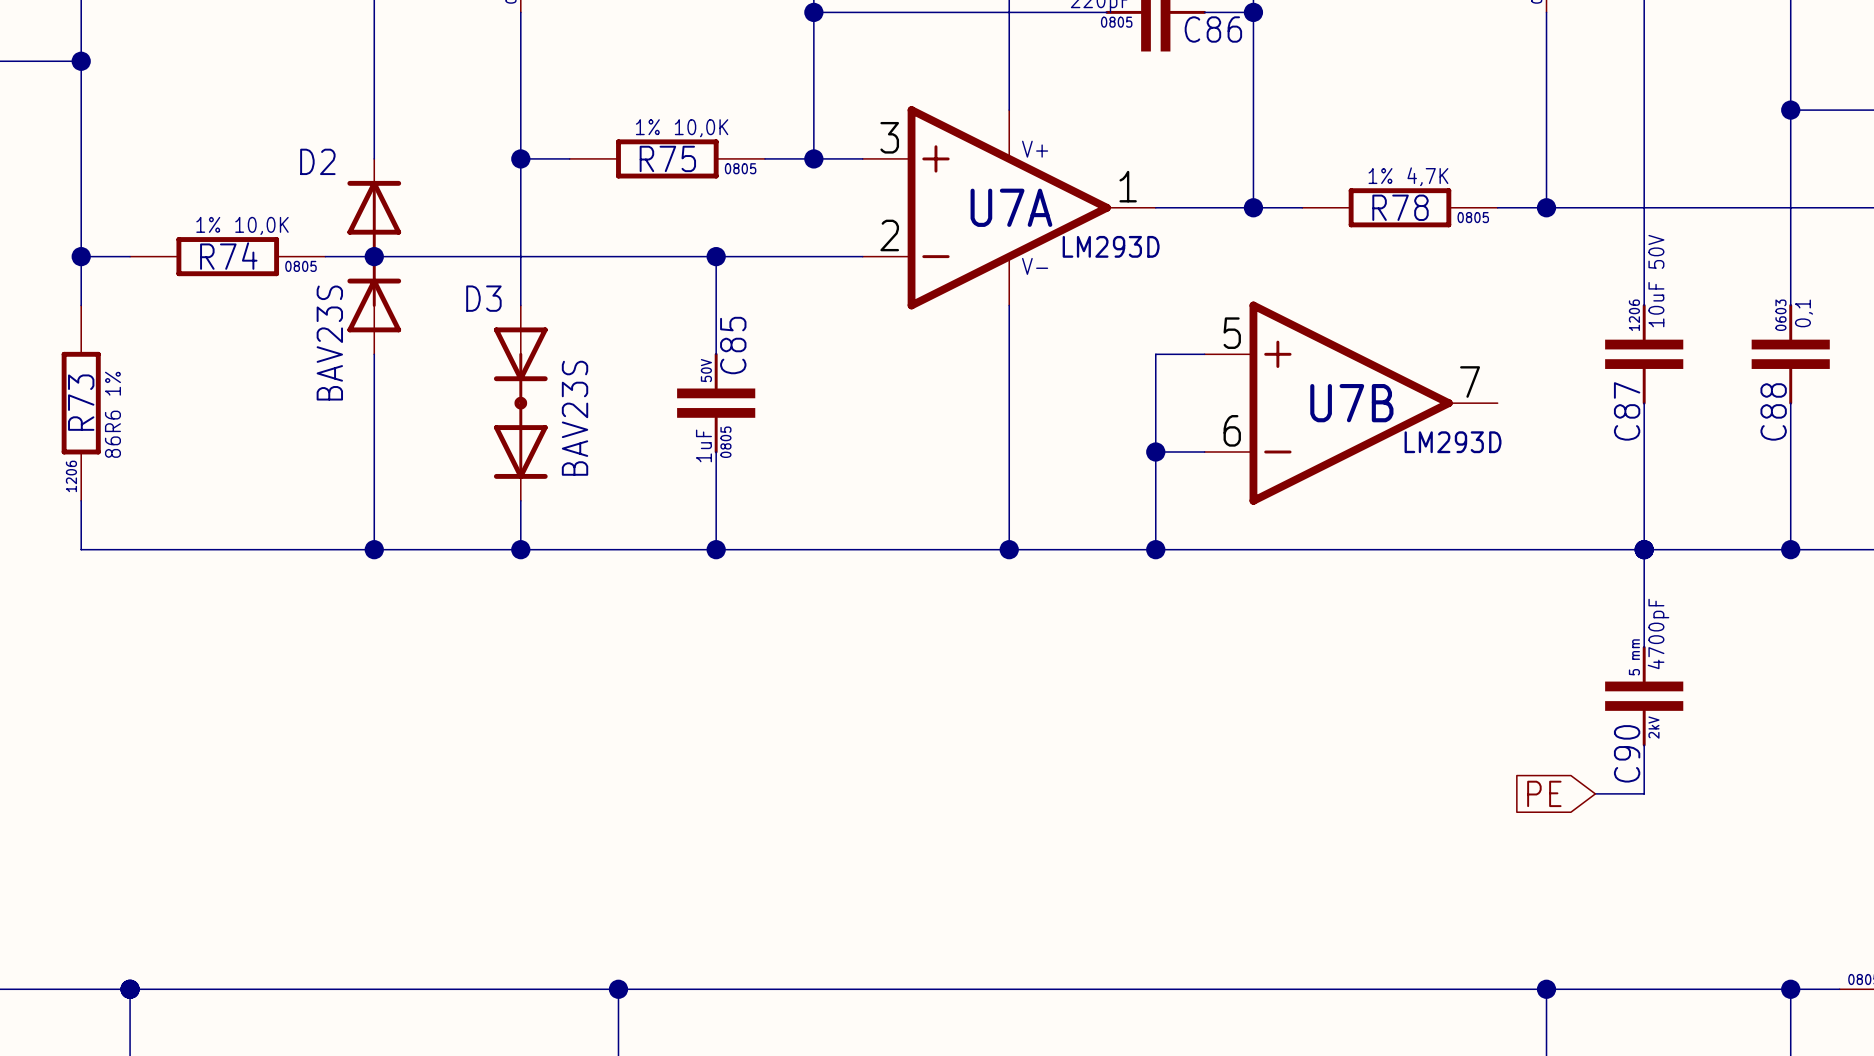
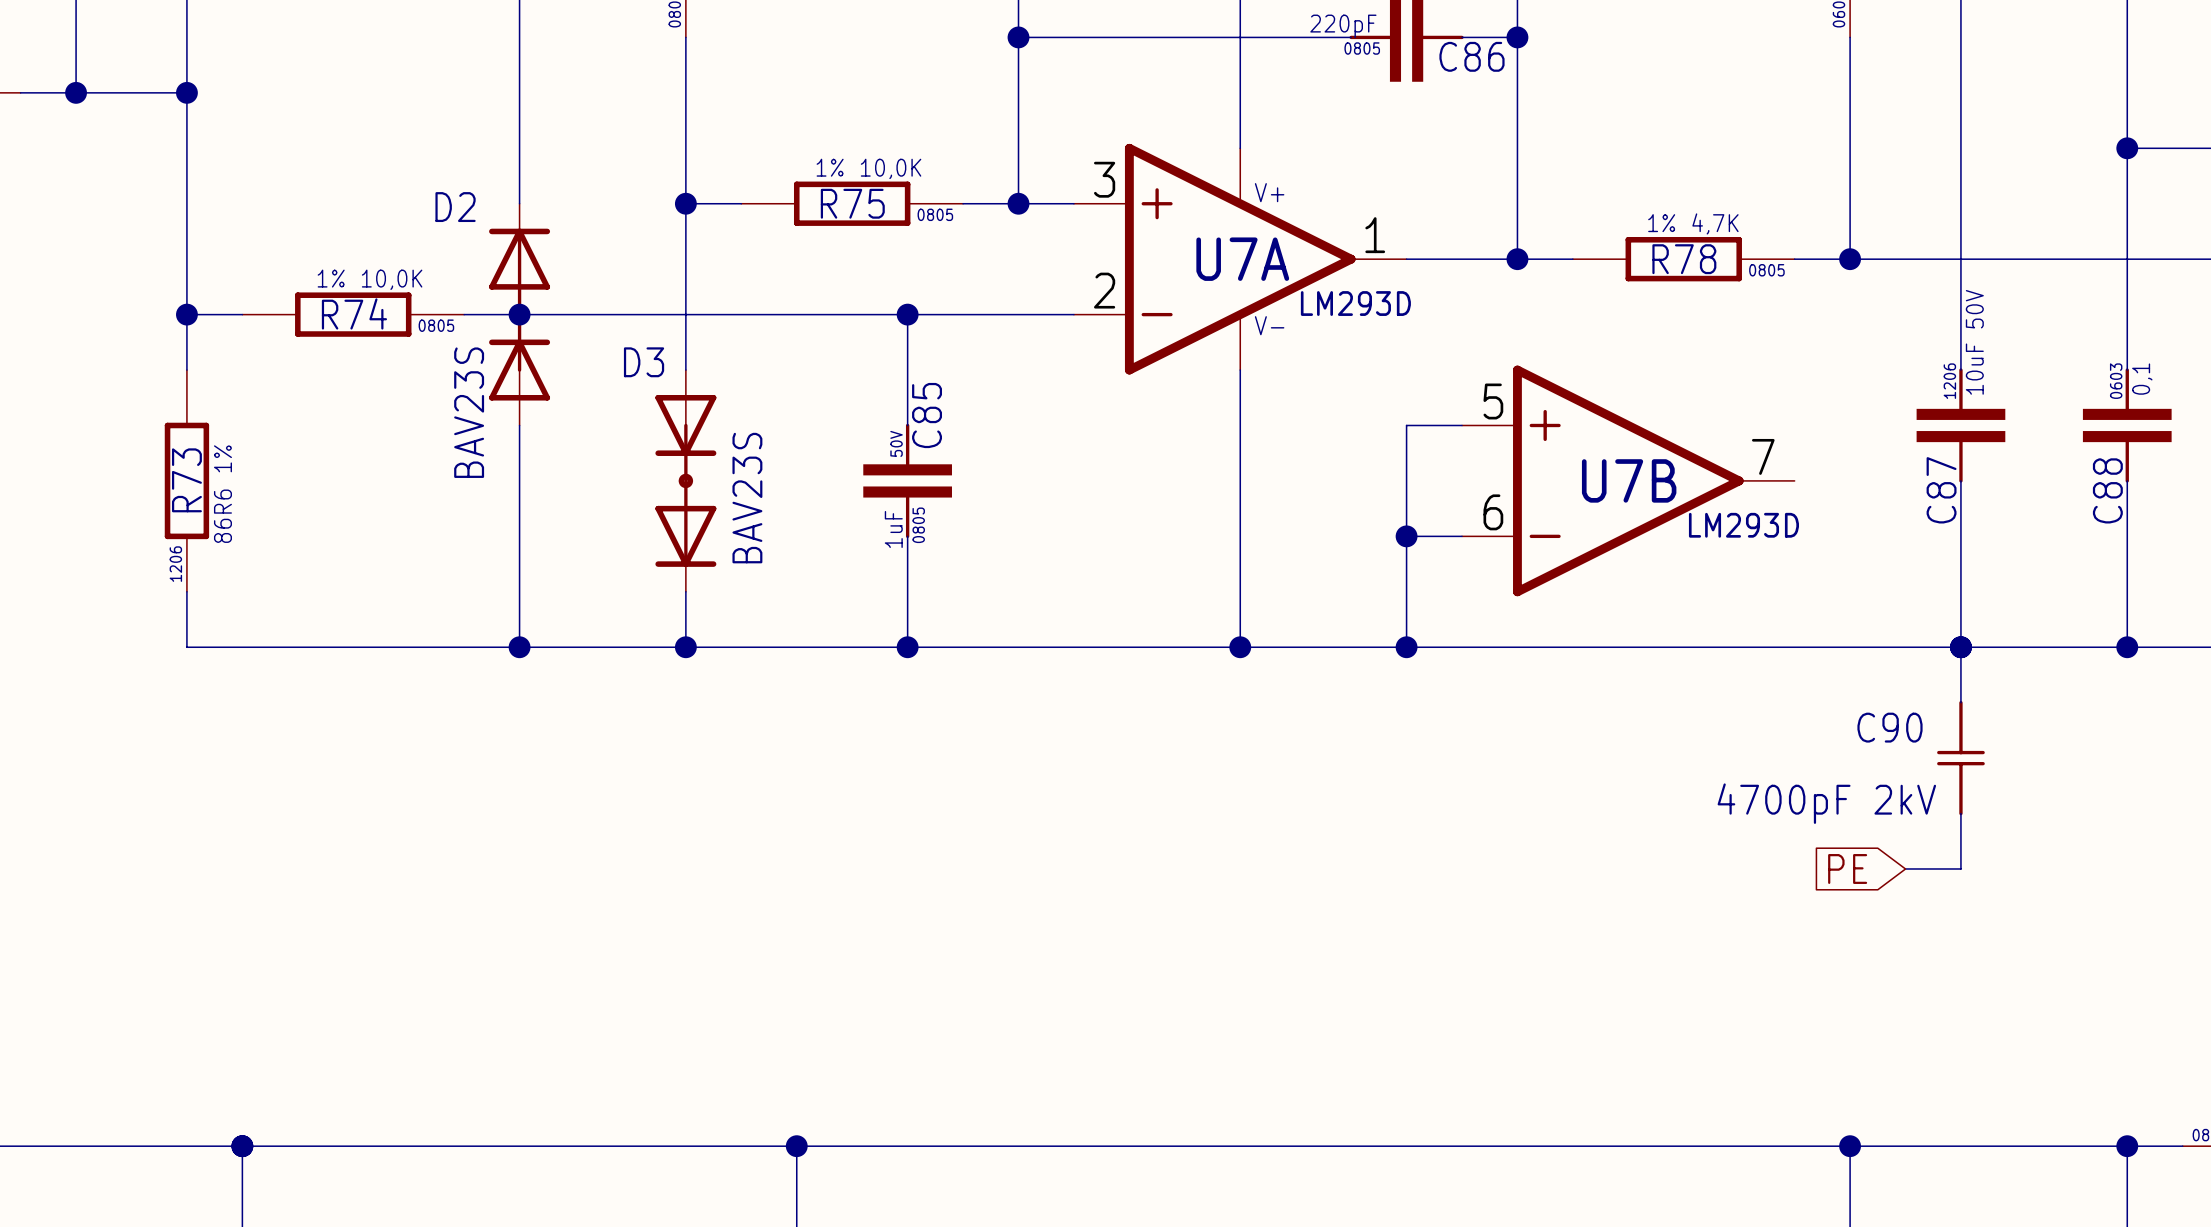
C90 value: 4700pF (1658, 633) -> 4700pF 2kV (1826, 803)
C90 symbol: [1605, 645, 1684, 747] -> [1937, 701, 1985, 816]
C90 text: 5 mm (1634, 657) -> none
C90 text: 2kV (1653, 727) -> none
wire: (1644, 745) (1644, 793) (1595, 793) -> (1960, 813) (1960, 868) (1905, 868)
C90 name position: C90 (1627, 753) -> C90 (1890, 727)
global label position: PE (1544, 793) -> PE (1847, 868)

